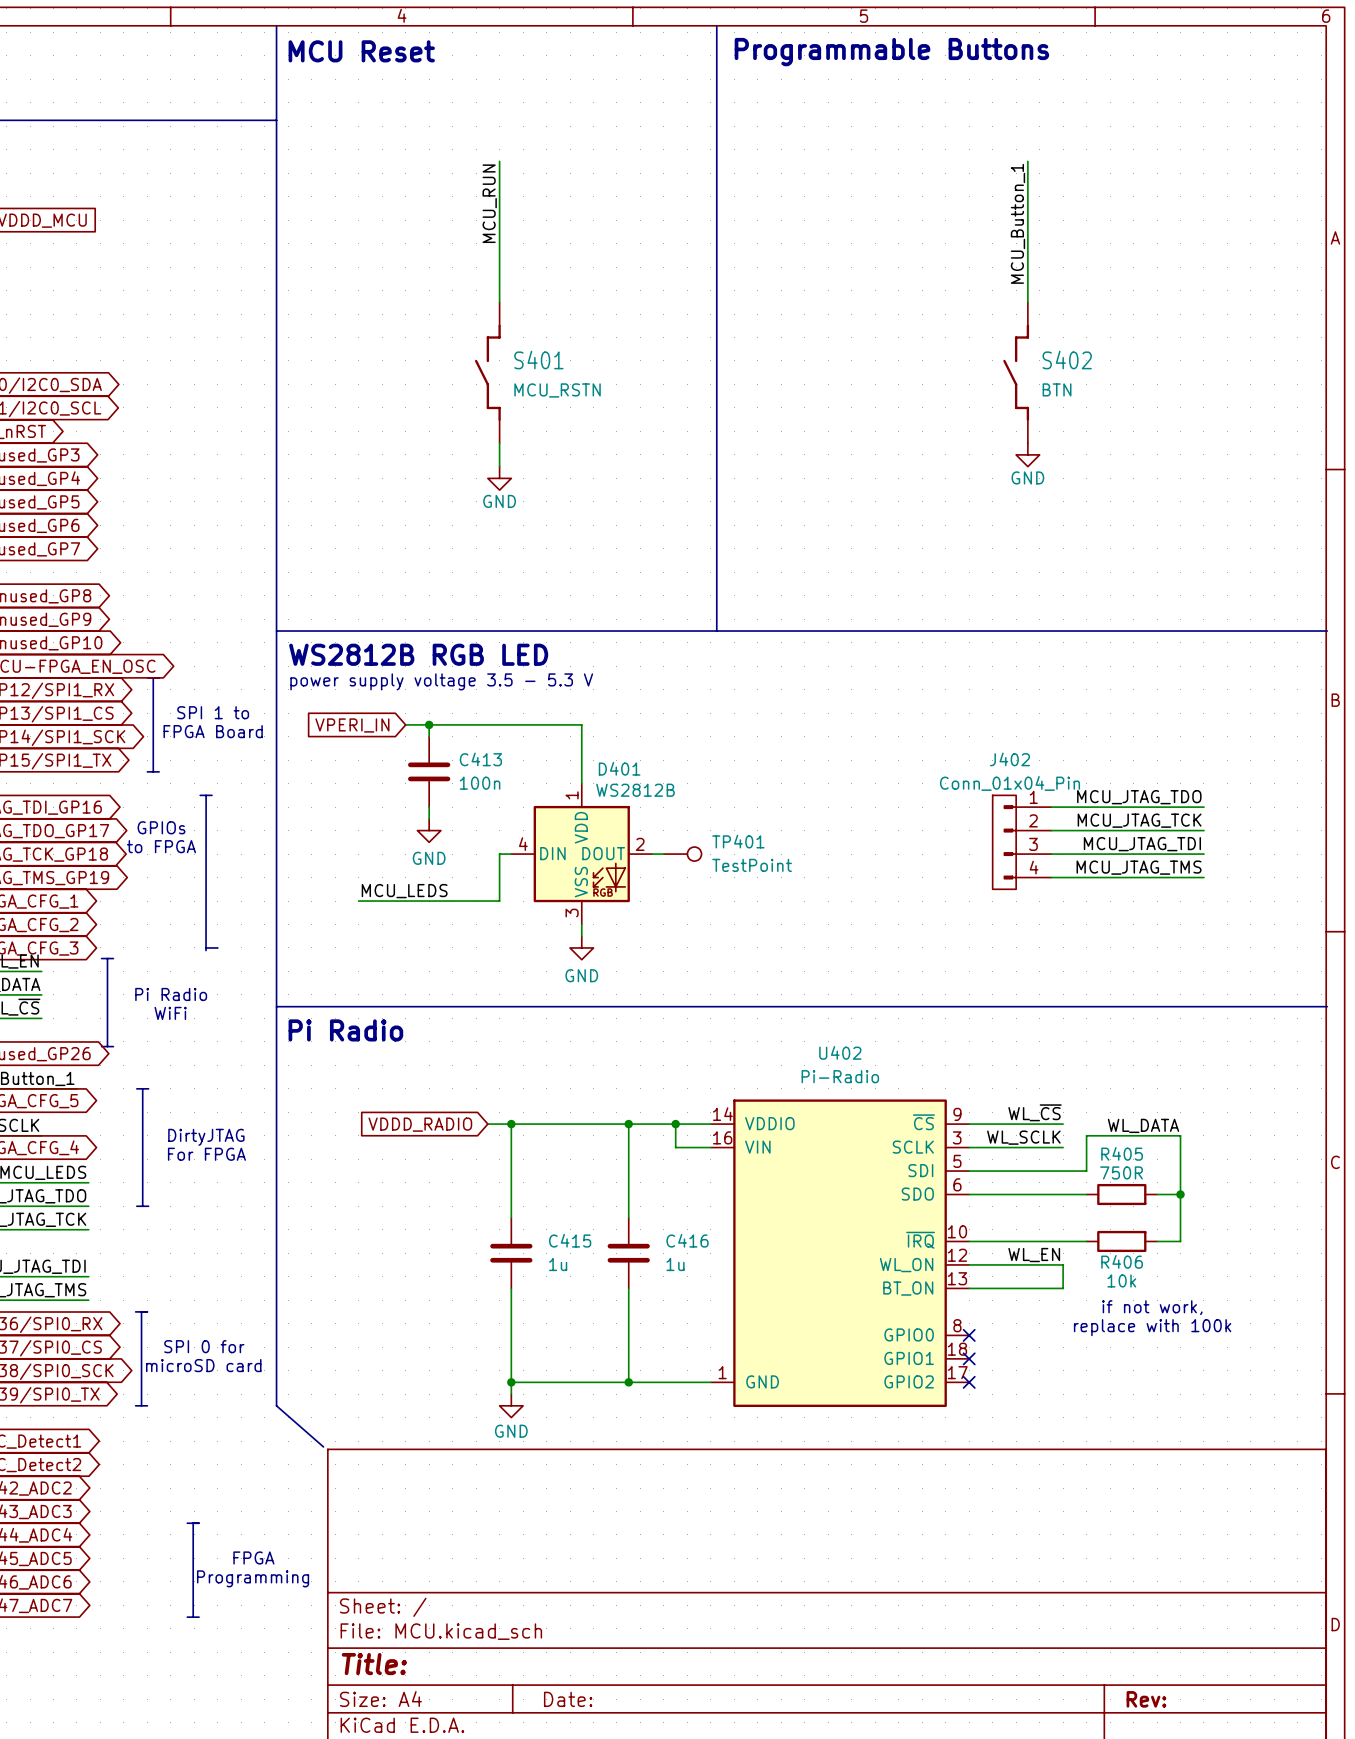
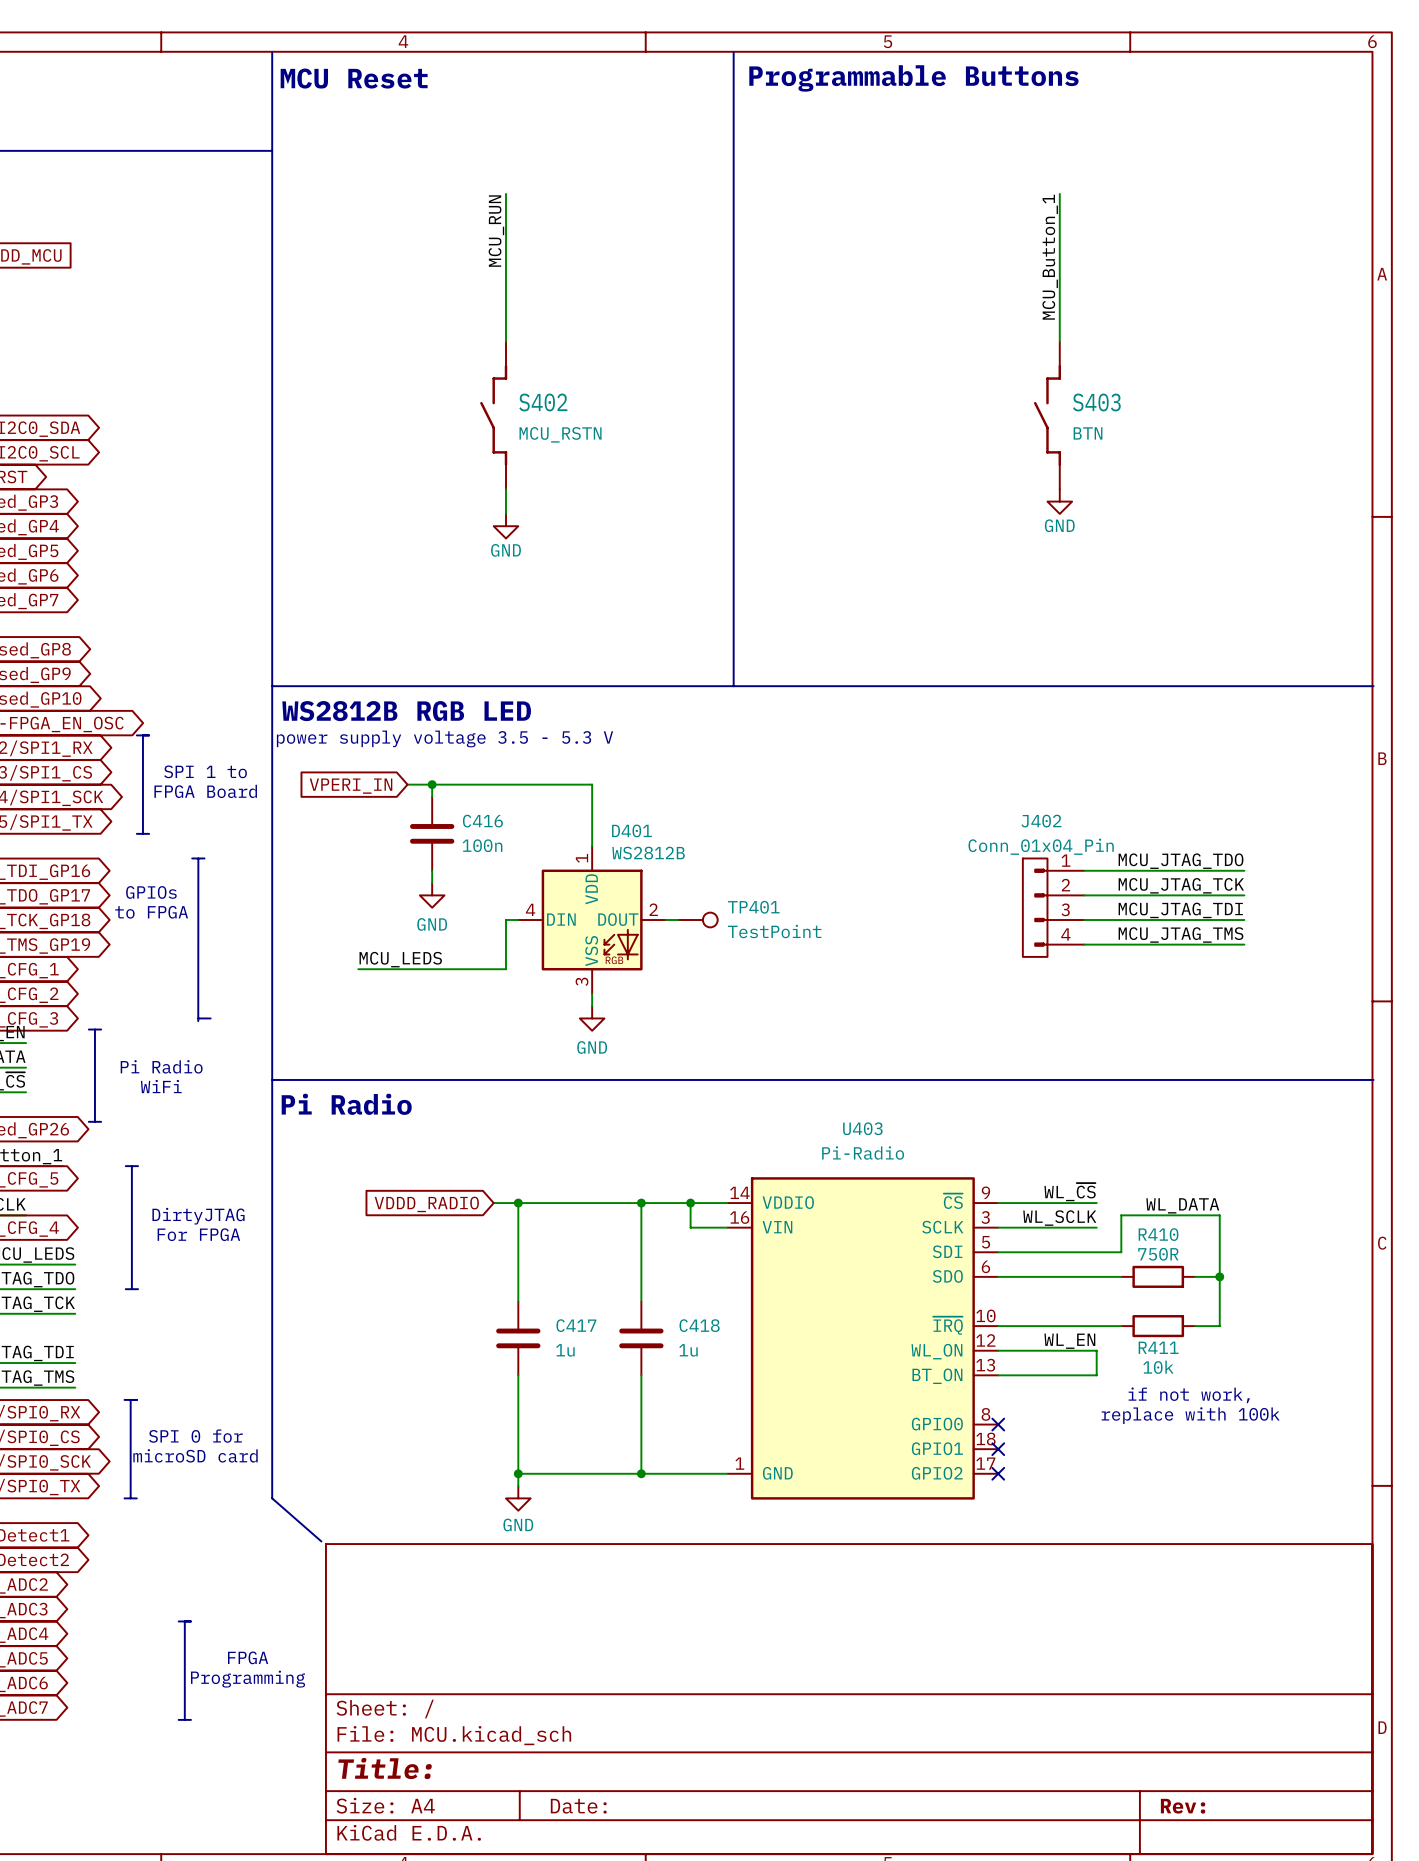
S401 name: S401 (538, 359) -> S402 (543, 402)
S402 name: S402 (1067, 359) -> S403 (1096, 402)
C413 name: C413 (480, 759) -> C416 (482, 821)
U402 name: U402 (840, 1052) -> U403 (862, 1128)
R405 name: R405 (1122, 1153) -> R410 (1158, 1234)
C415 name: C415 (570, 1240) -> C417 (576, 1325)
C416 name: C416 (687, 1240) -> C418 (699, 1325)
R406 name: R406 (1122, 1261) -> R411 (1158, 1347)

